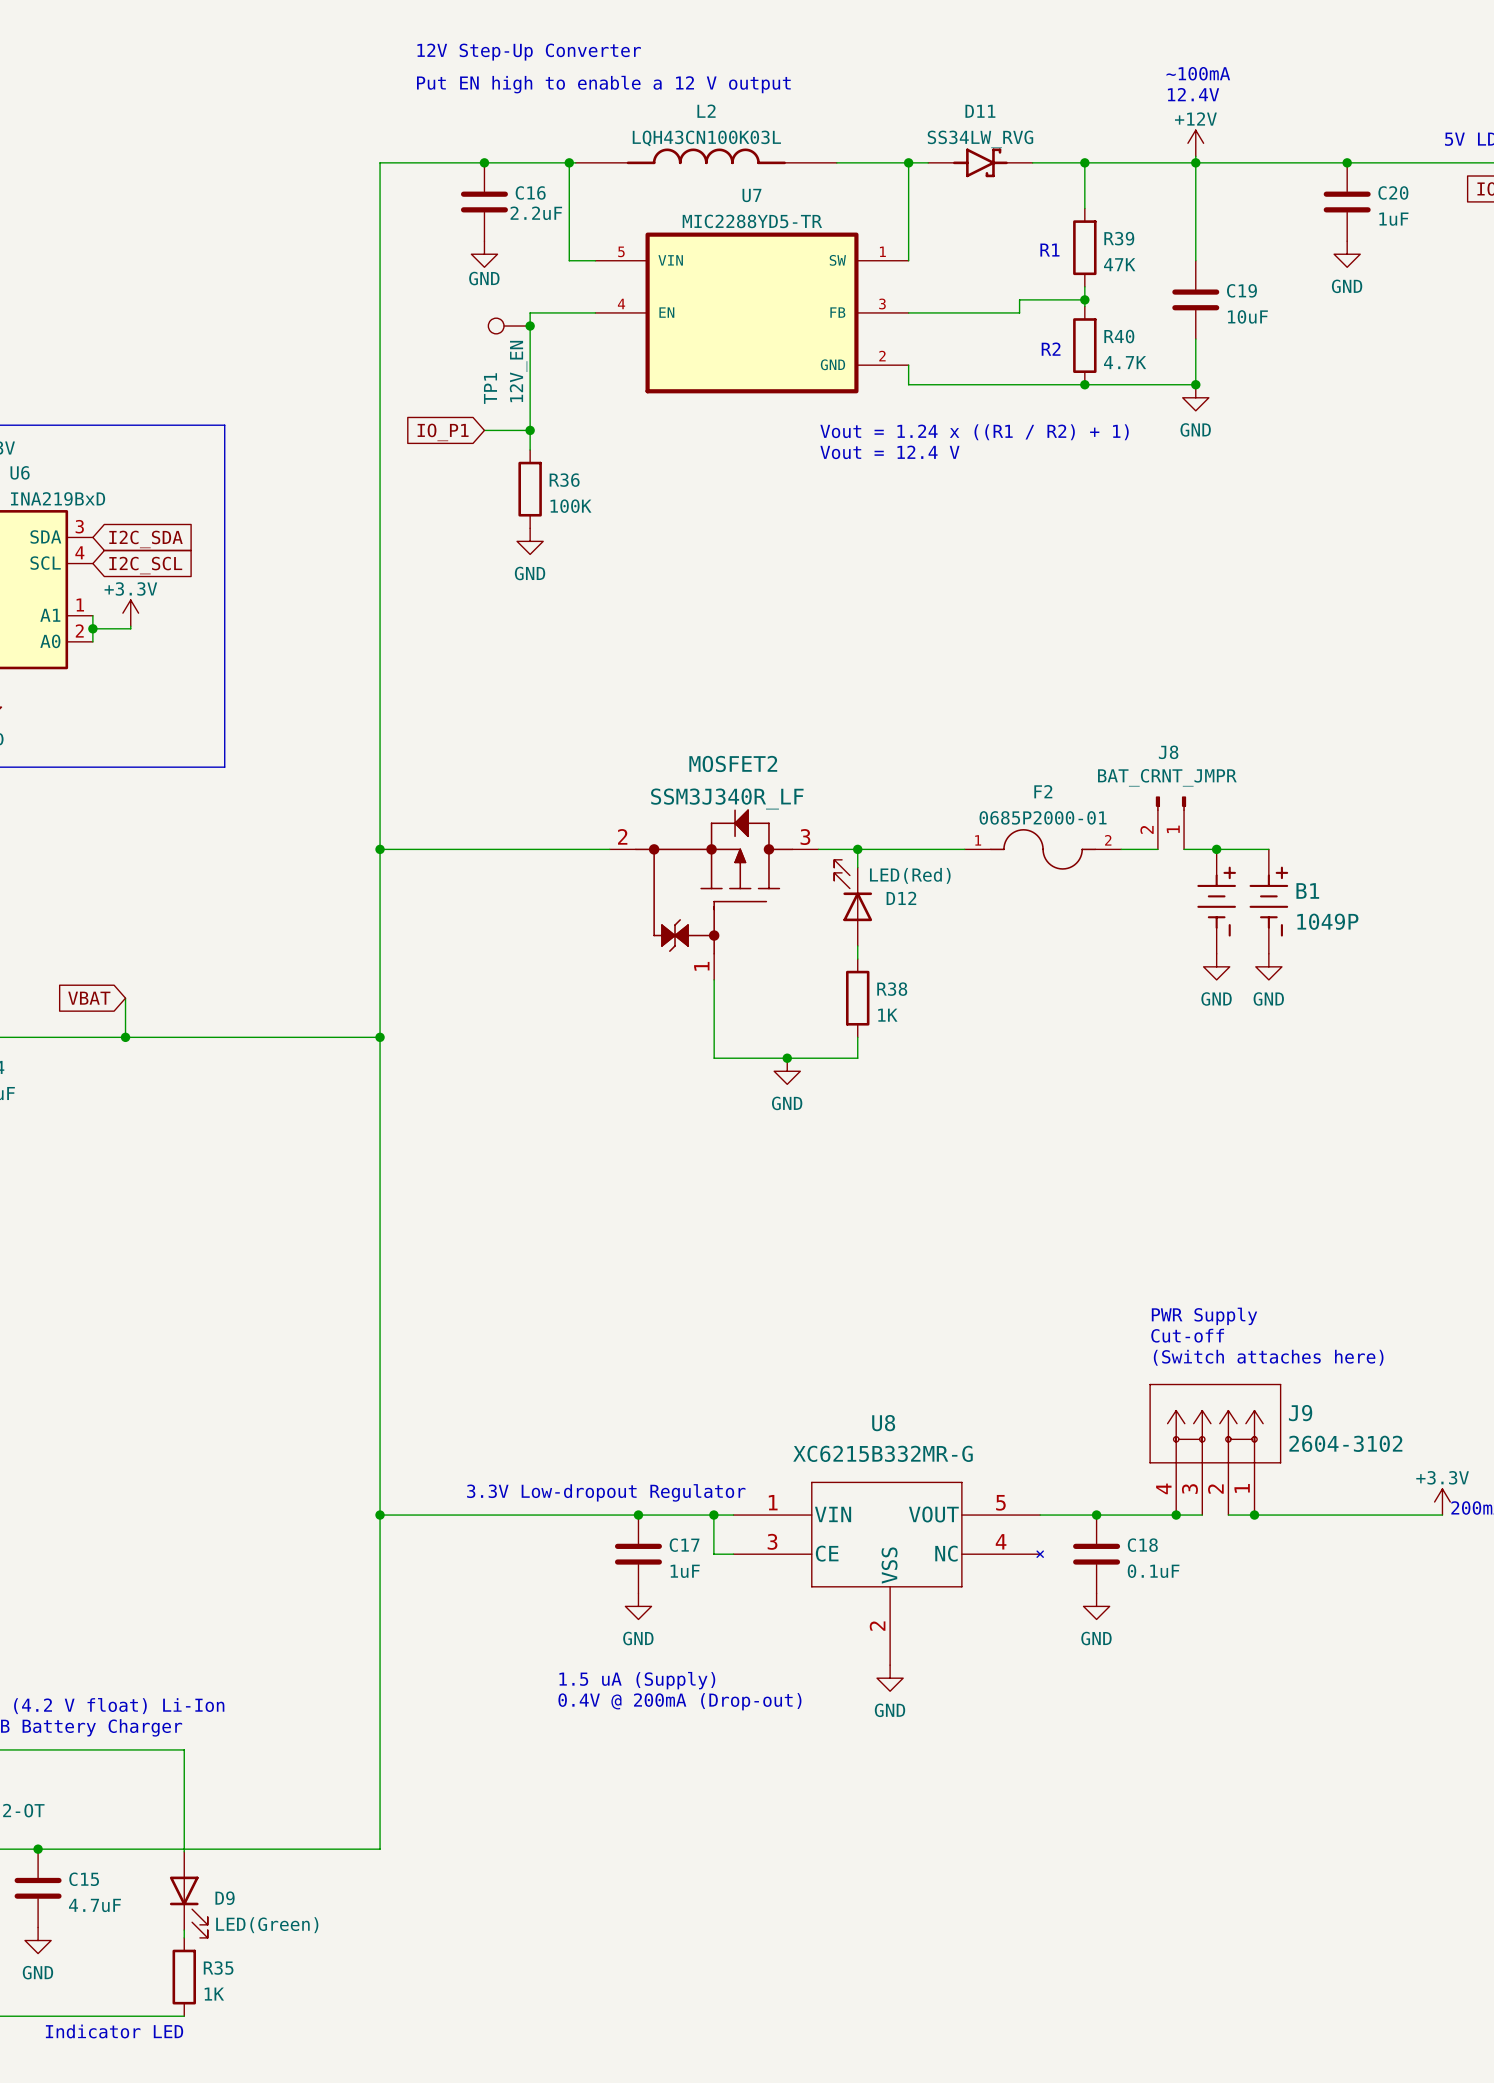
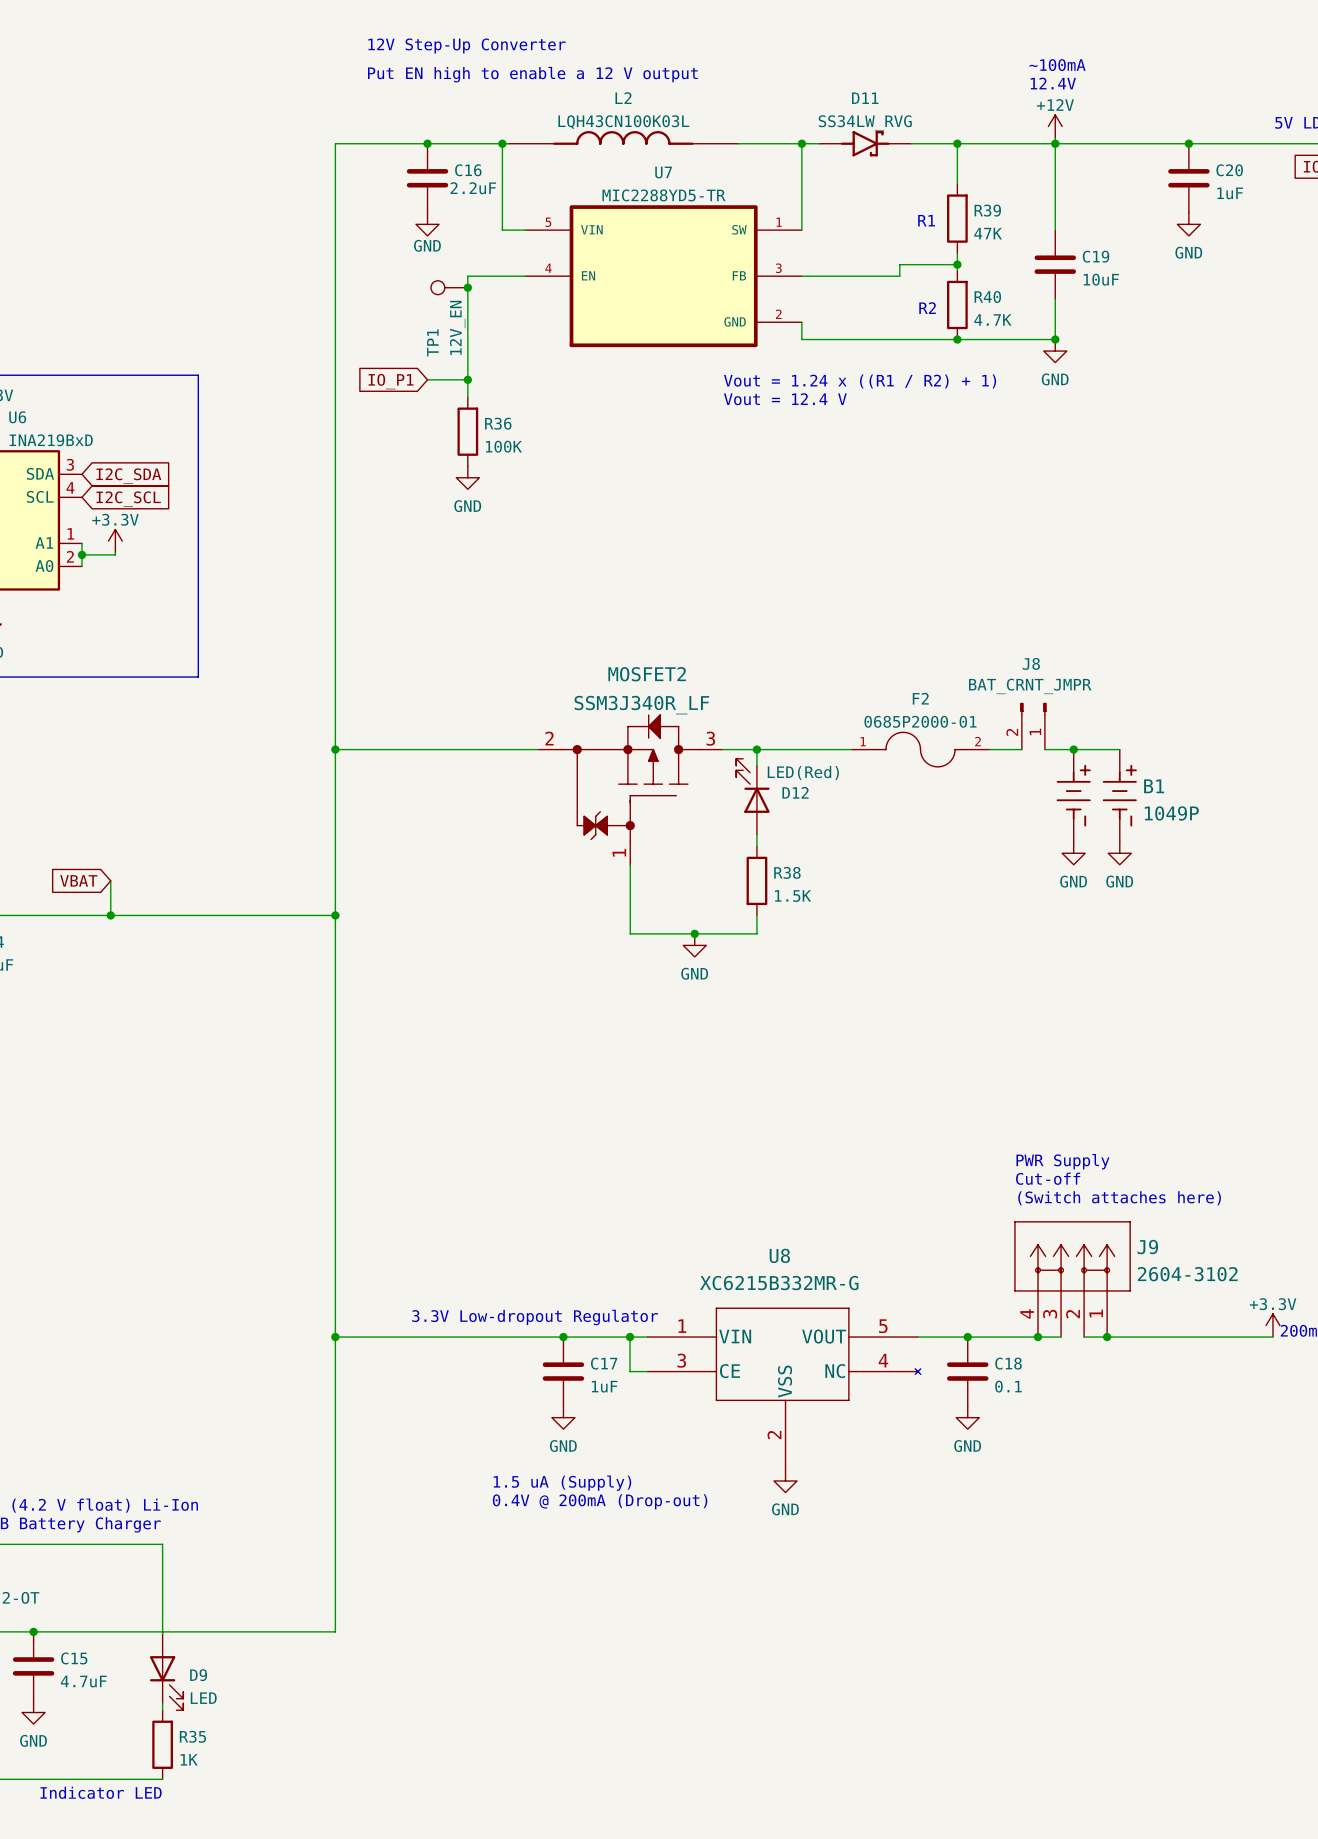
R38 value: 1K (887, 1015) -> 1.5K (793, 896)
C18 value: 0.1uF (1153, 1571) -> 0.1 (1008, 1386)
D9 value: LED(Green) (267, 1925) -> LED (203, 1698)

